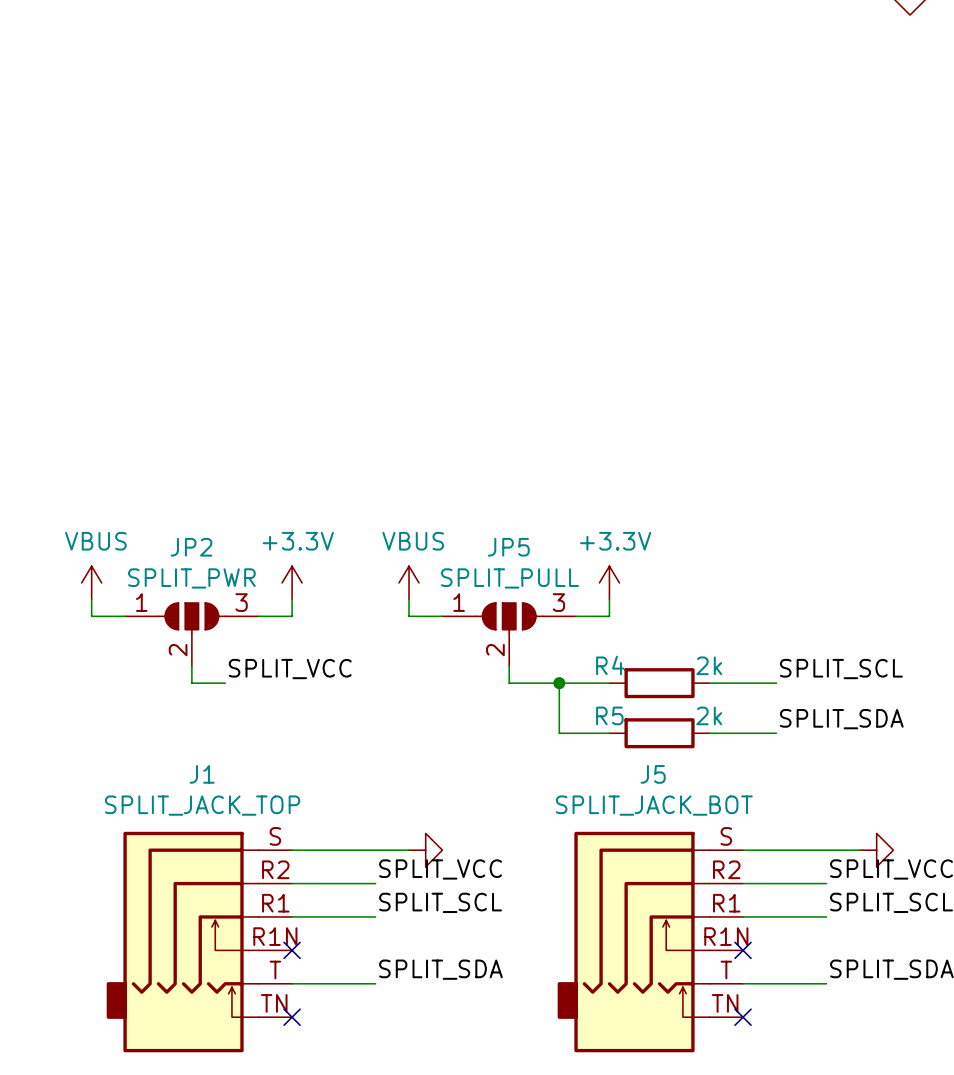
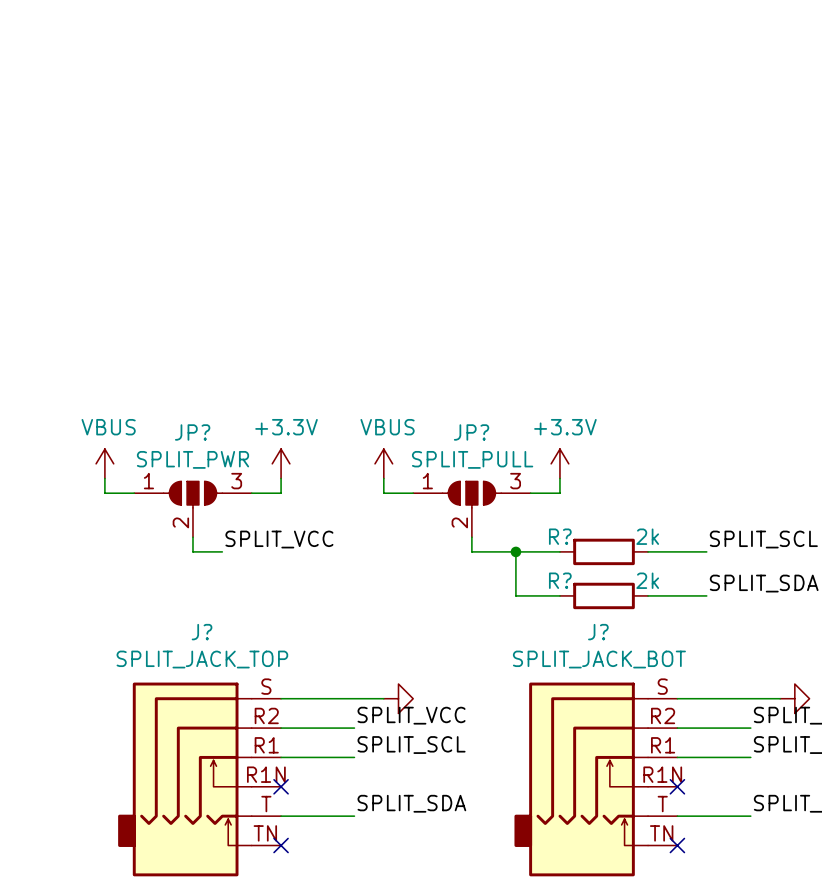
JP2 name: JP2 (191, 547) -> JP? (192, 432)
JP5 name: JP5 (508, 547) -> JP? (471, 432)
R4 name: R4 (610, 665) -> R? (560, 536)
R5 name: R5 (609, 715) -> R? (560, 580)
J1 name: J1 (202, 774) -> J? (202, 632)
J5 name: J5 (653, 774) -> J? (598, 632)

